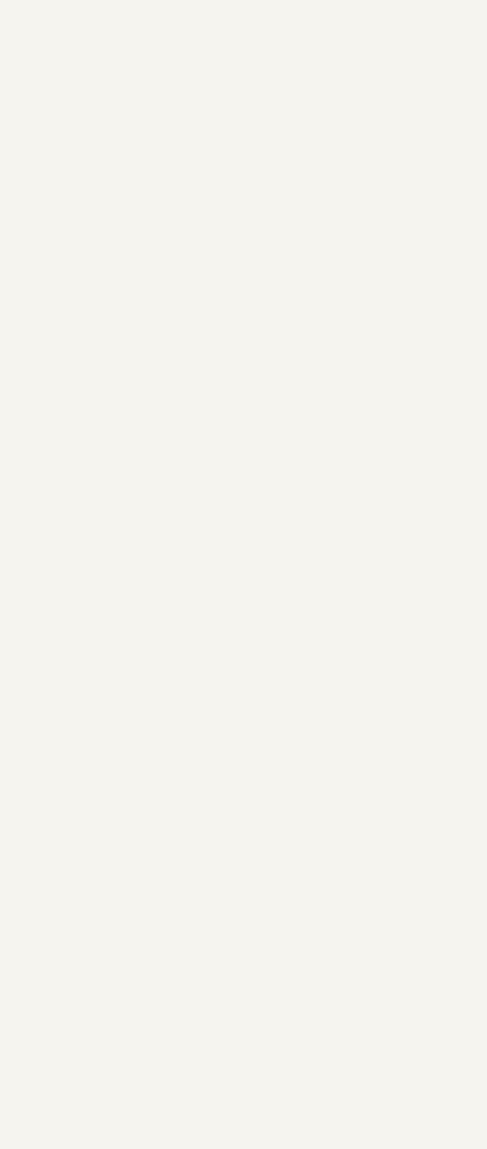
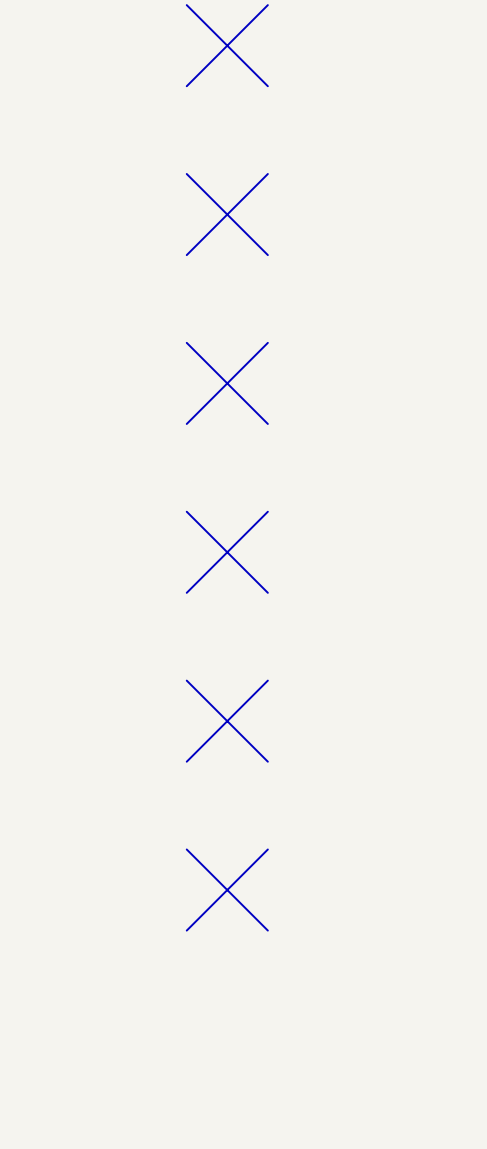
no-connect mark: none -> (227, 45)
no-connect mark: none -> (227, 214)
no-connect mark: none -> (227, 383)
no-connect mark: none -> (227, 552)
no-connect mark: none -> (227, 721)
no-connect mark: none -> (227, 890)

